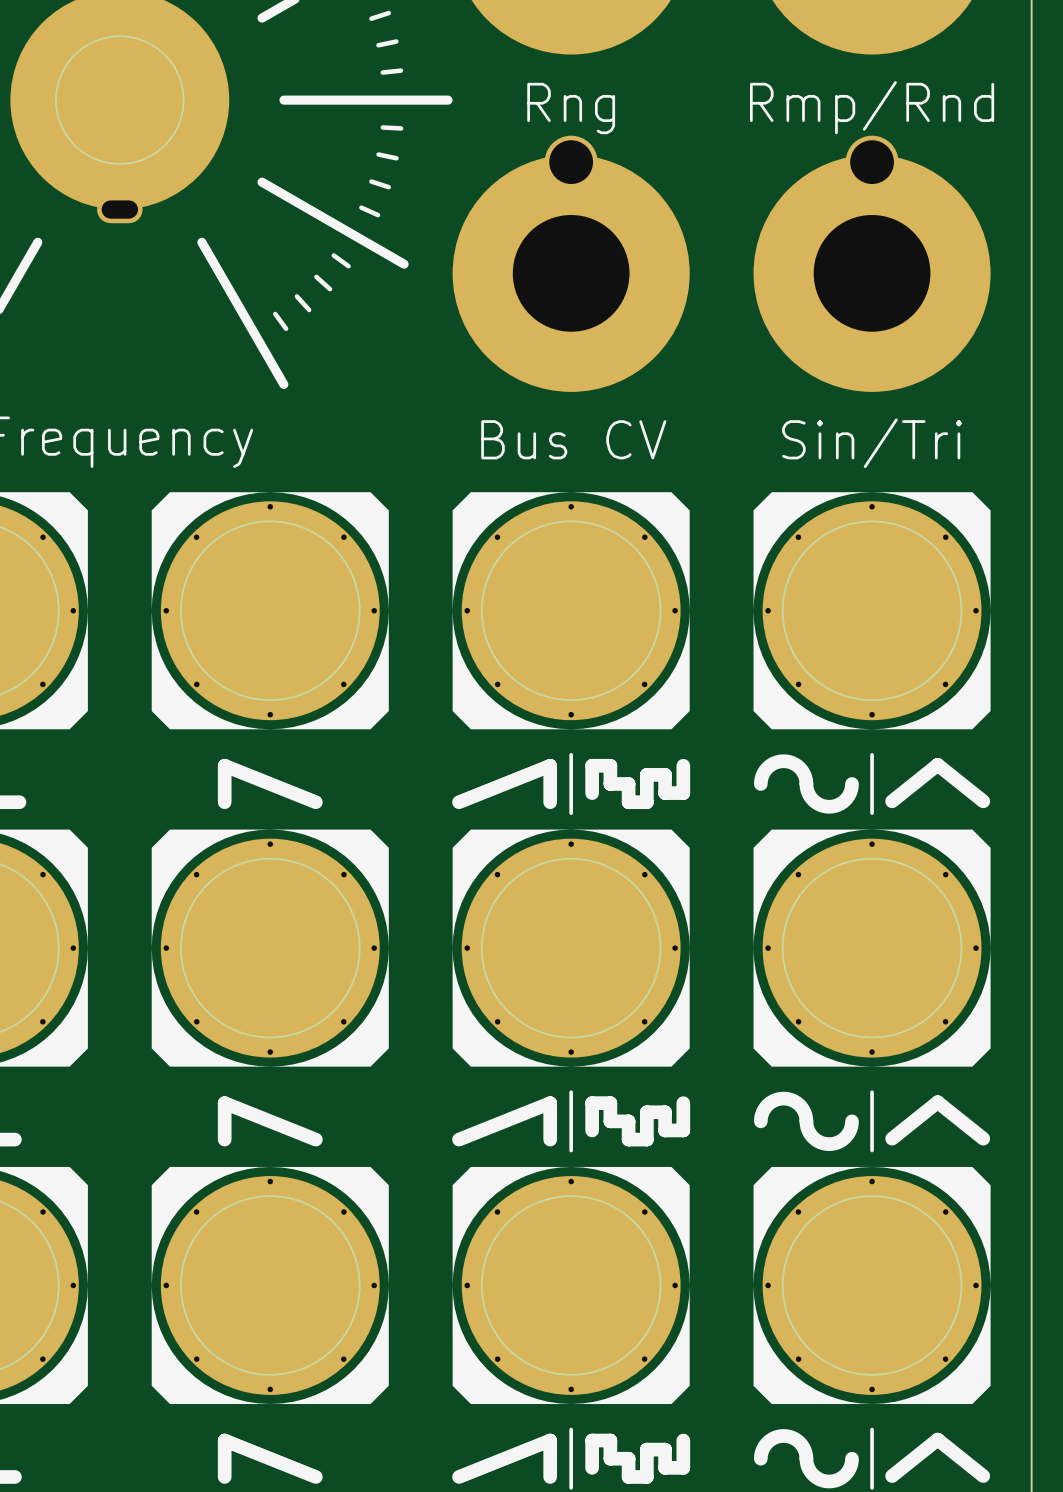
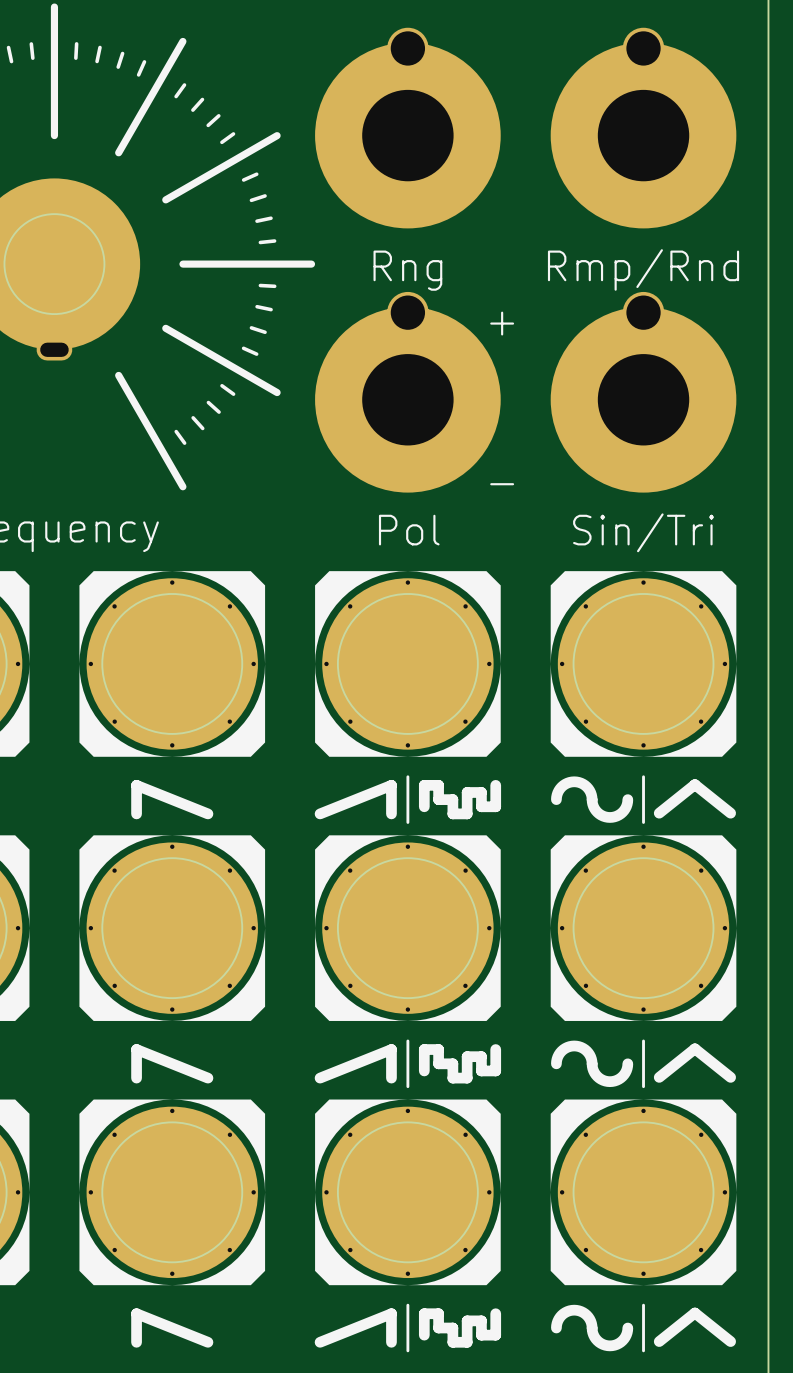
text: none -> + (502, 323)
text: none -> - (502, 484)
part value: Bus CV (573, 439) -> Pol (409, 530)

